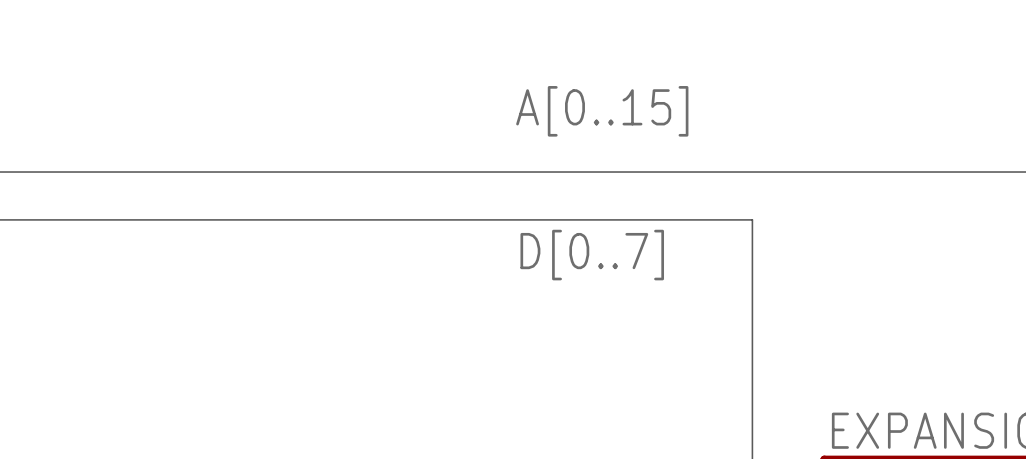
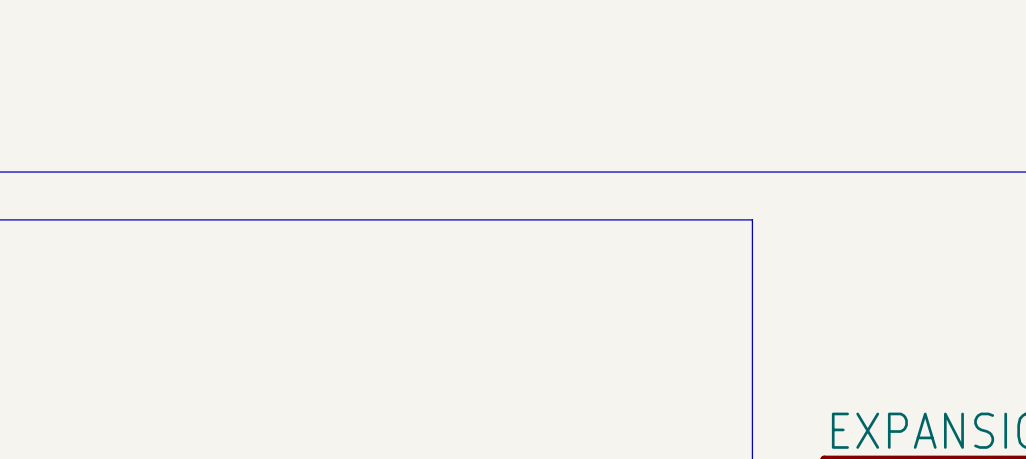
label: A[0..15] (602, 111) -> none
label: D[0..7] (592, 255) -> none

